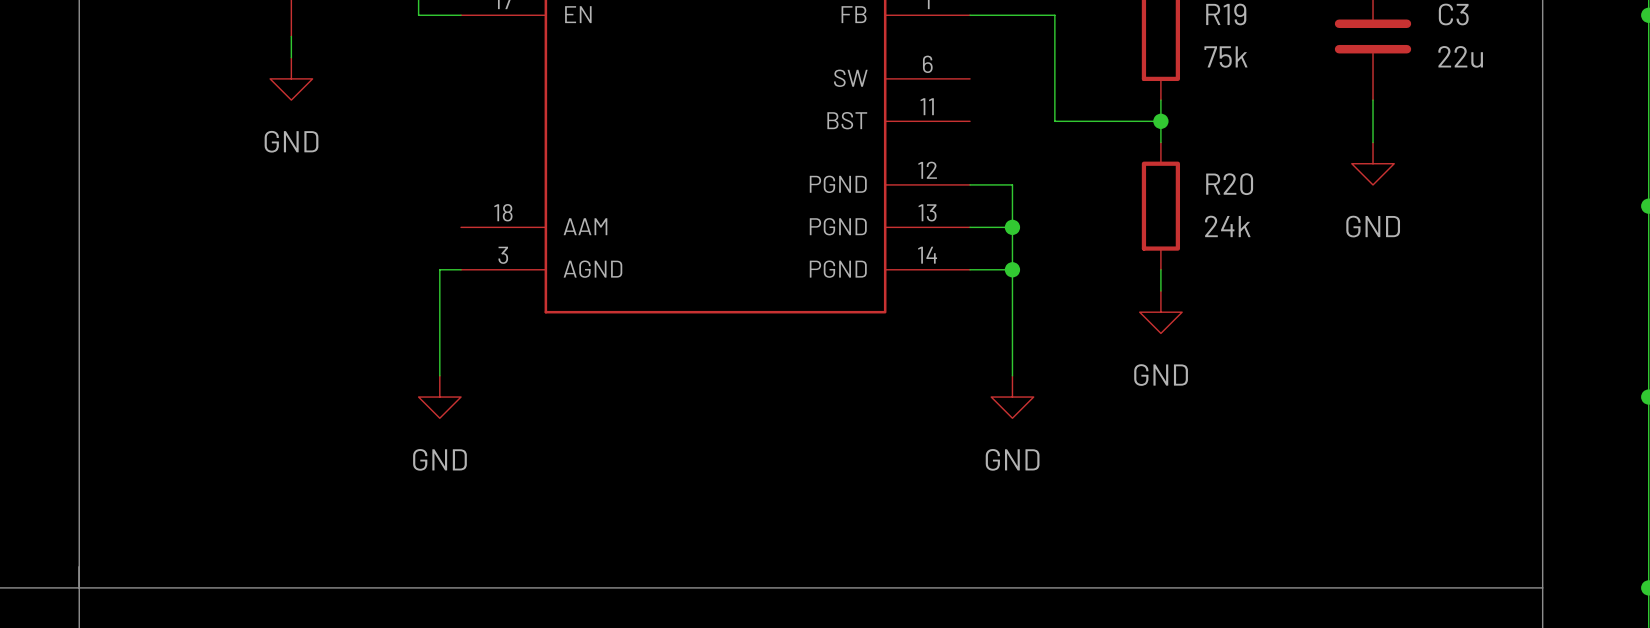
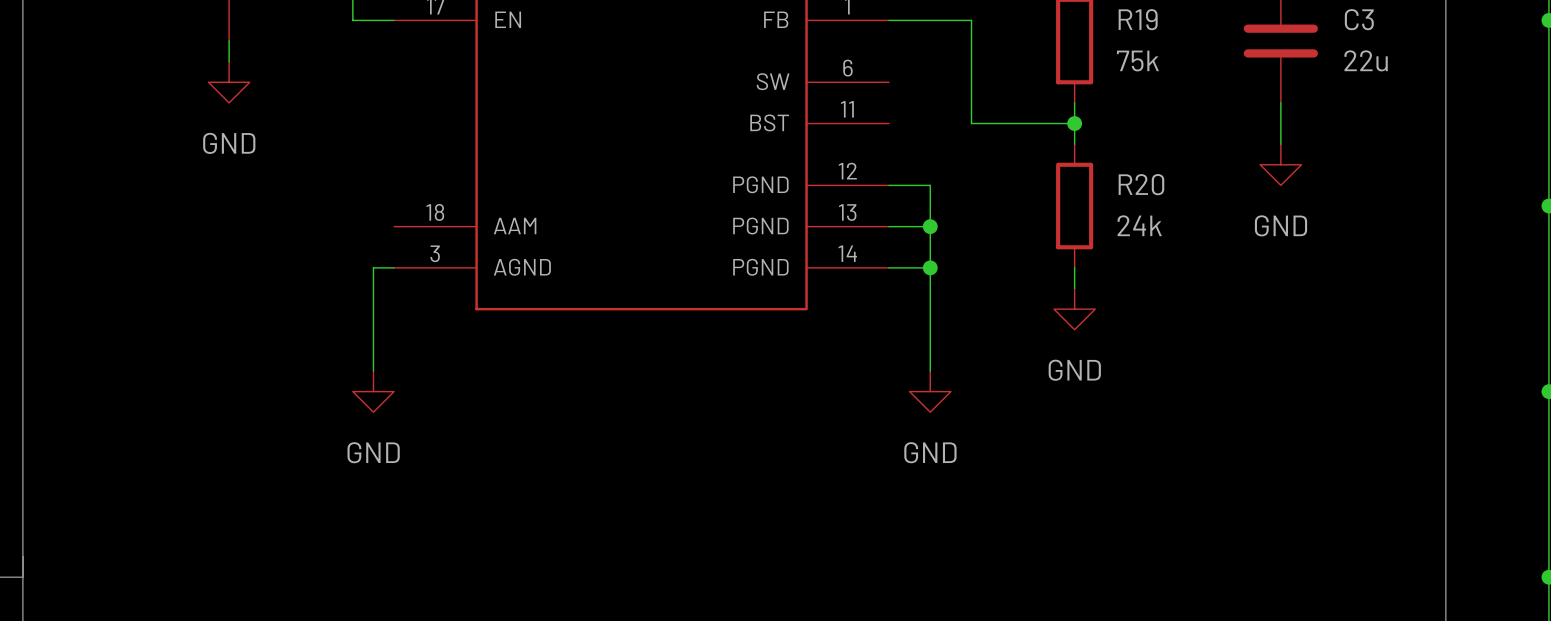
line: (79, 587) (1542, 587) -> none

